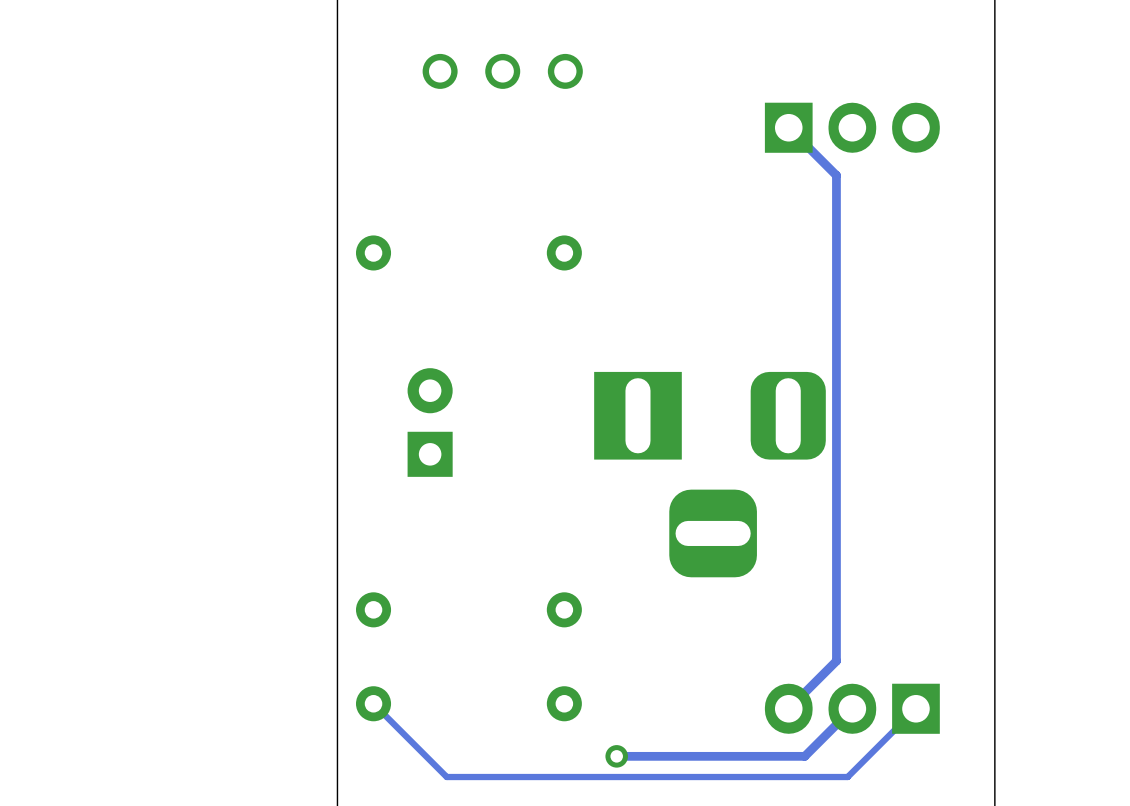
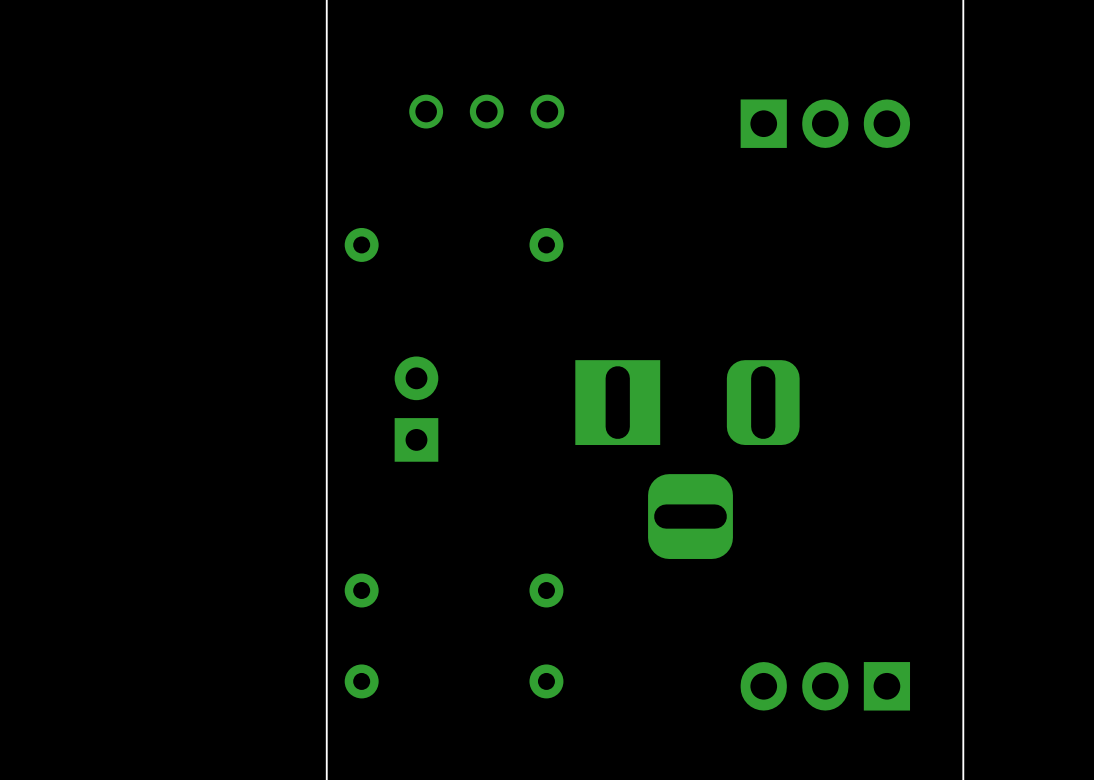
part position: (502, 71) -> (486, 111)
track: (788, 127) (836, 175) (836, 661) (788, 708) -> none
track: (373, 703) (446, 777) (847, 777) (915, 708) -> none
track: (852, 708) (804, 756) (616, 756) -> none
via: (616, 756) -> none

